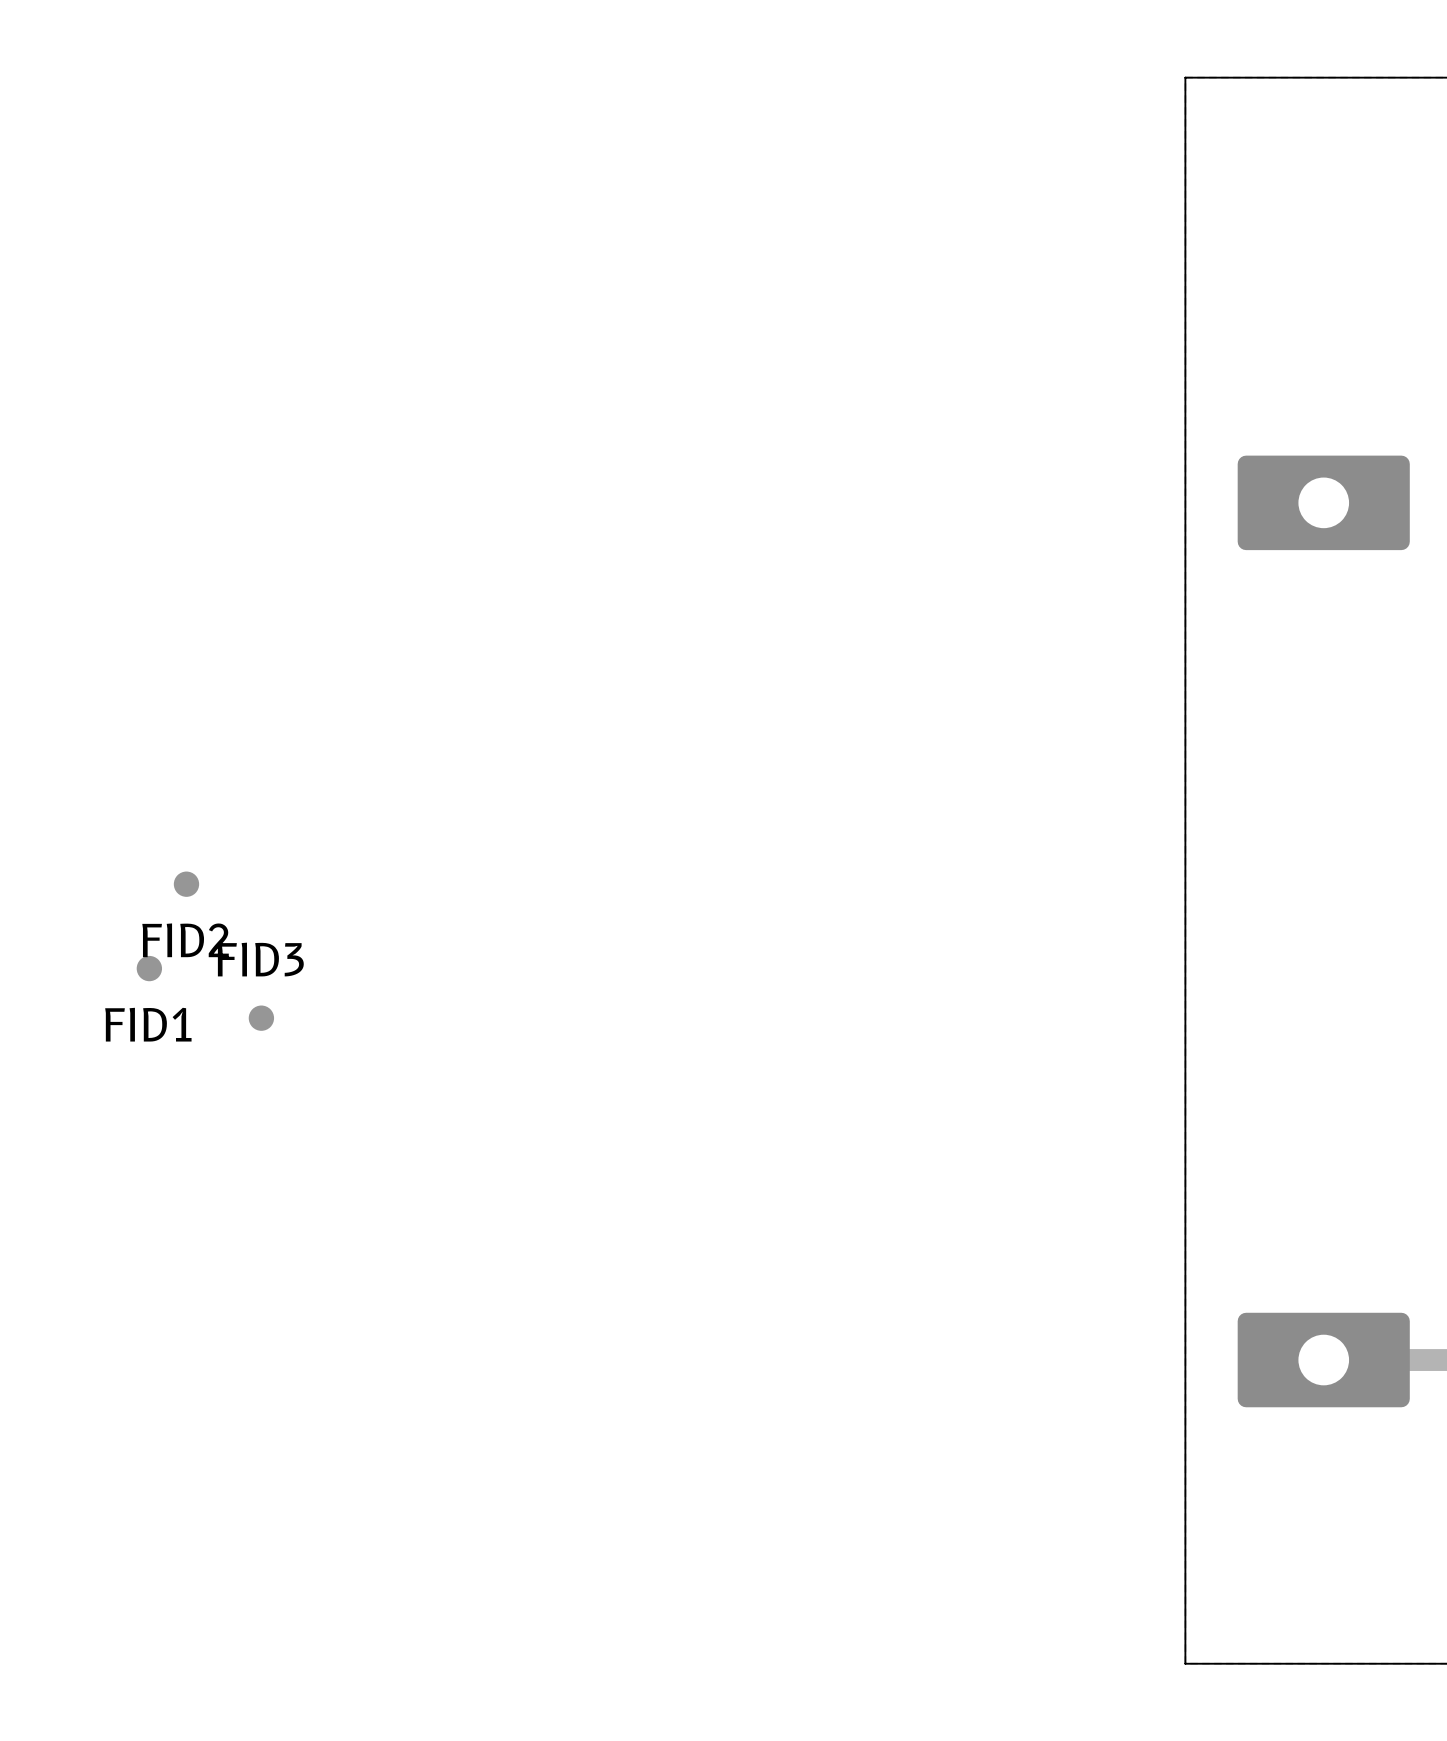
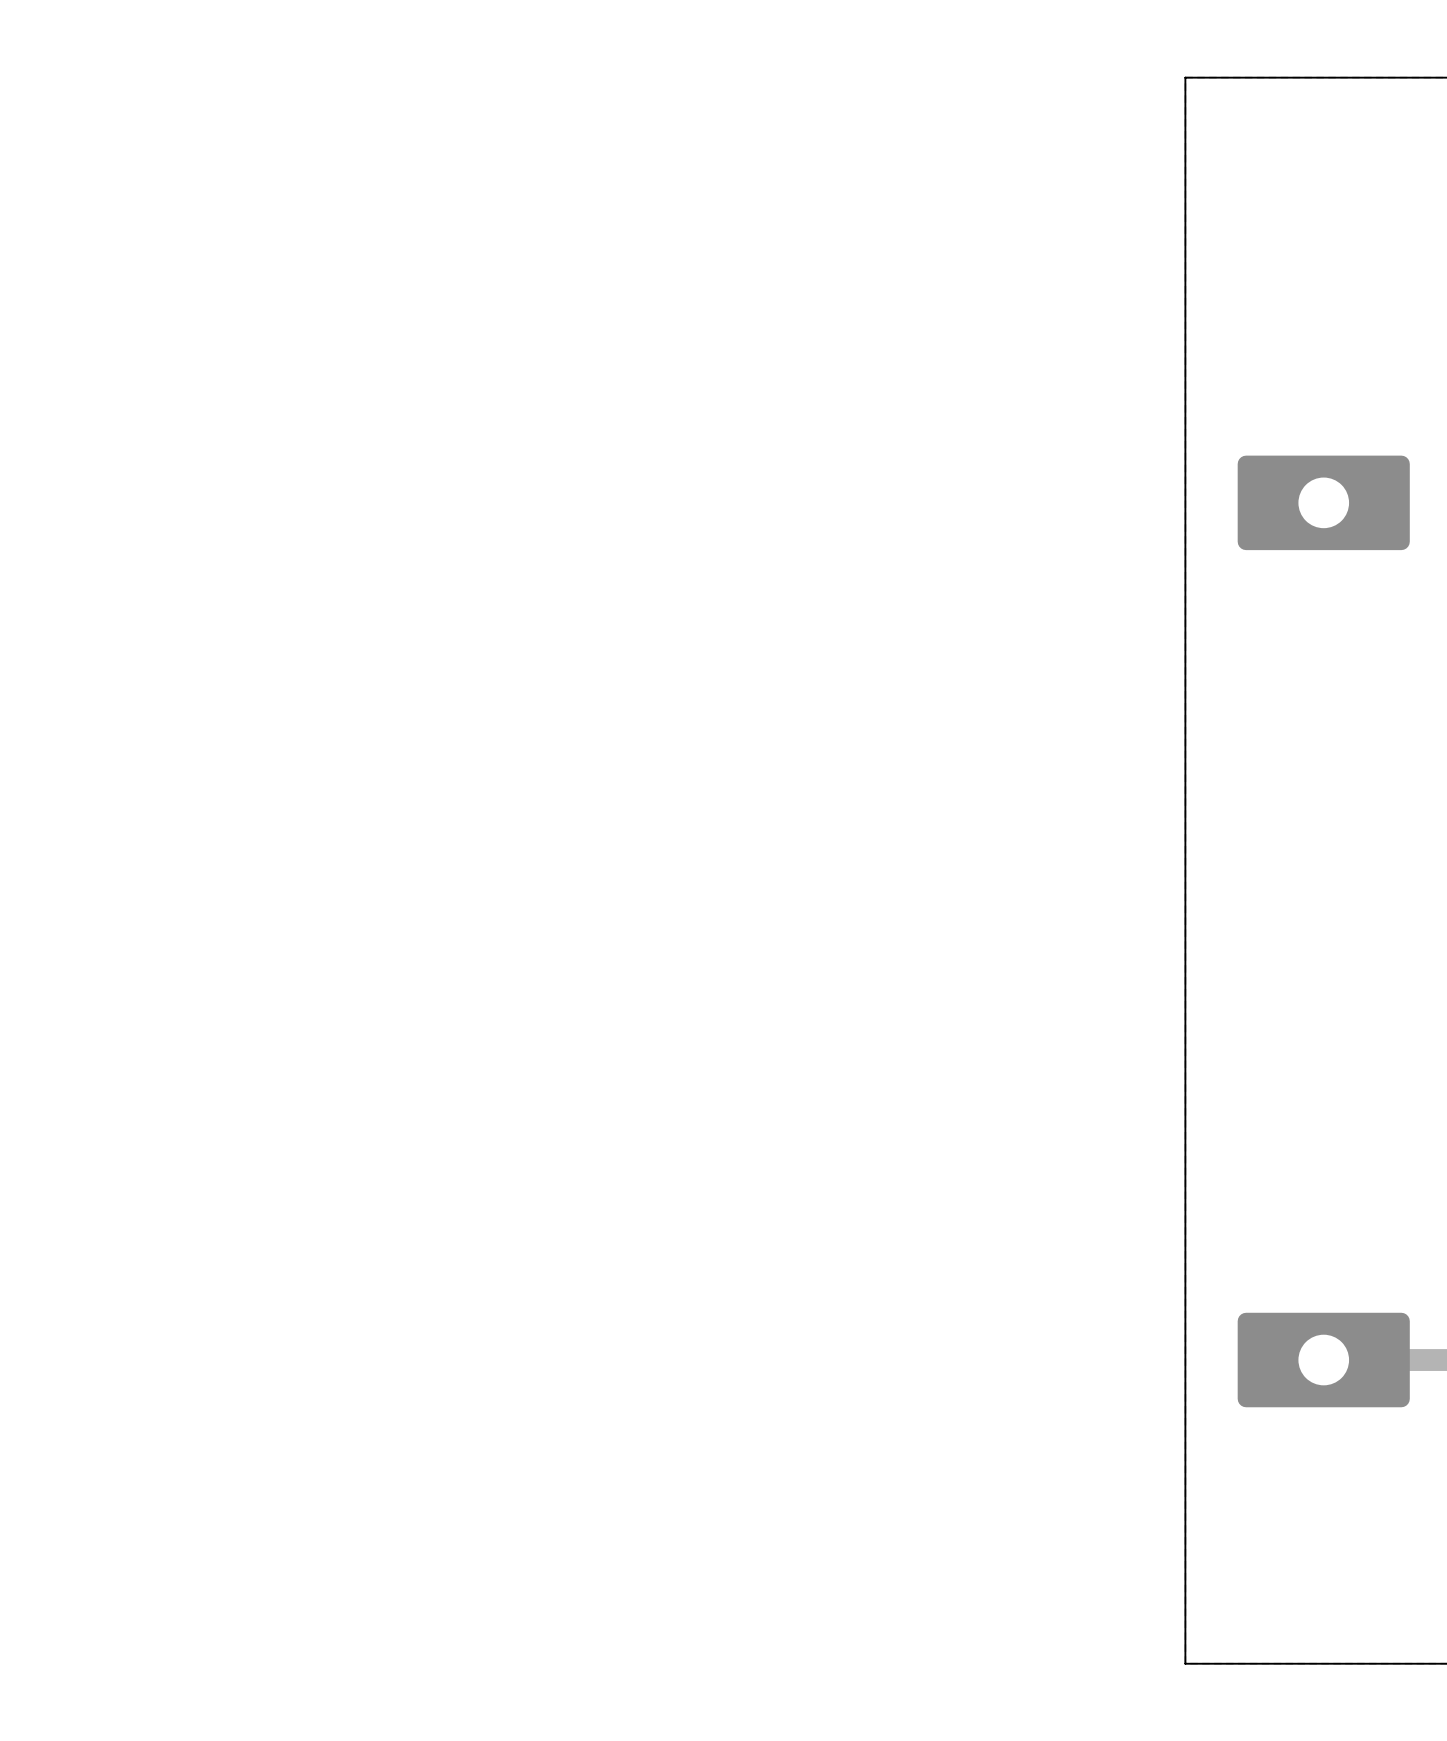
FID2: (186, 884) -> none
FID1: (149, 968) -> none
FID3: (261, 1018) -> none

